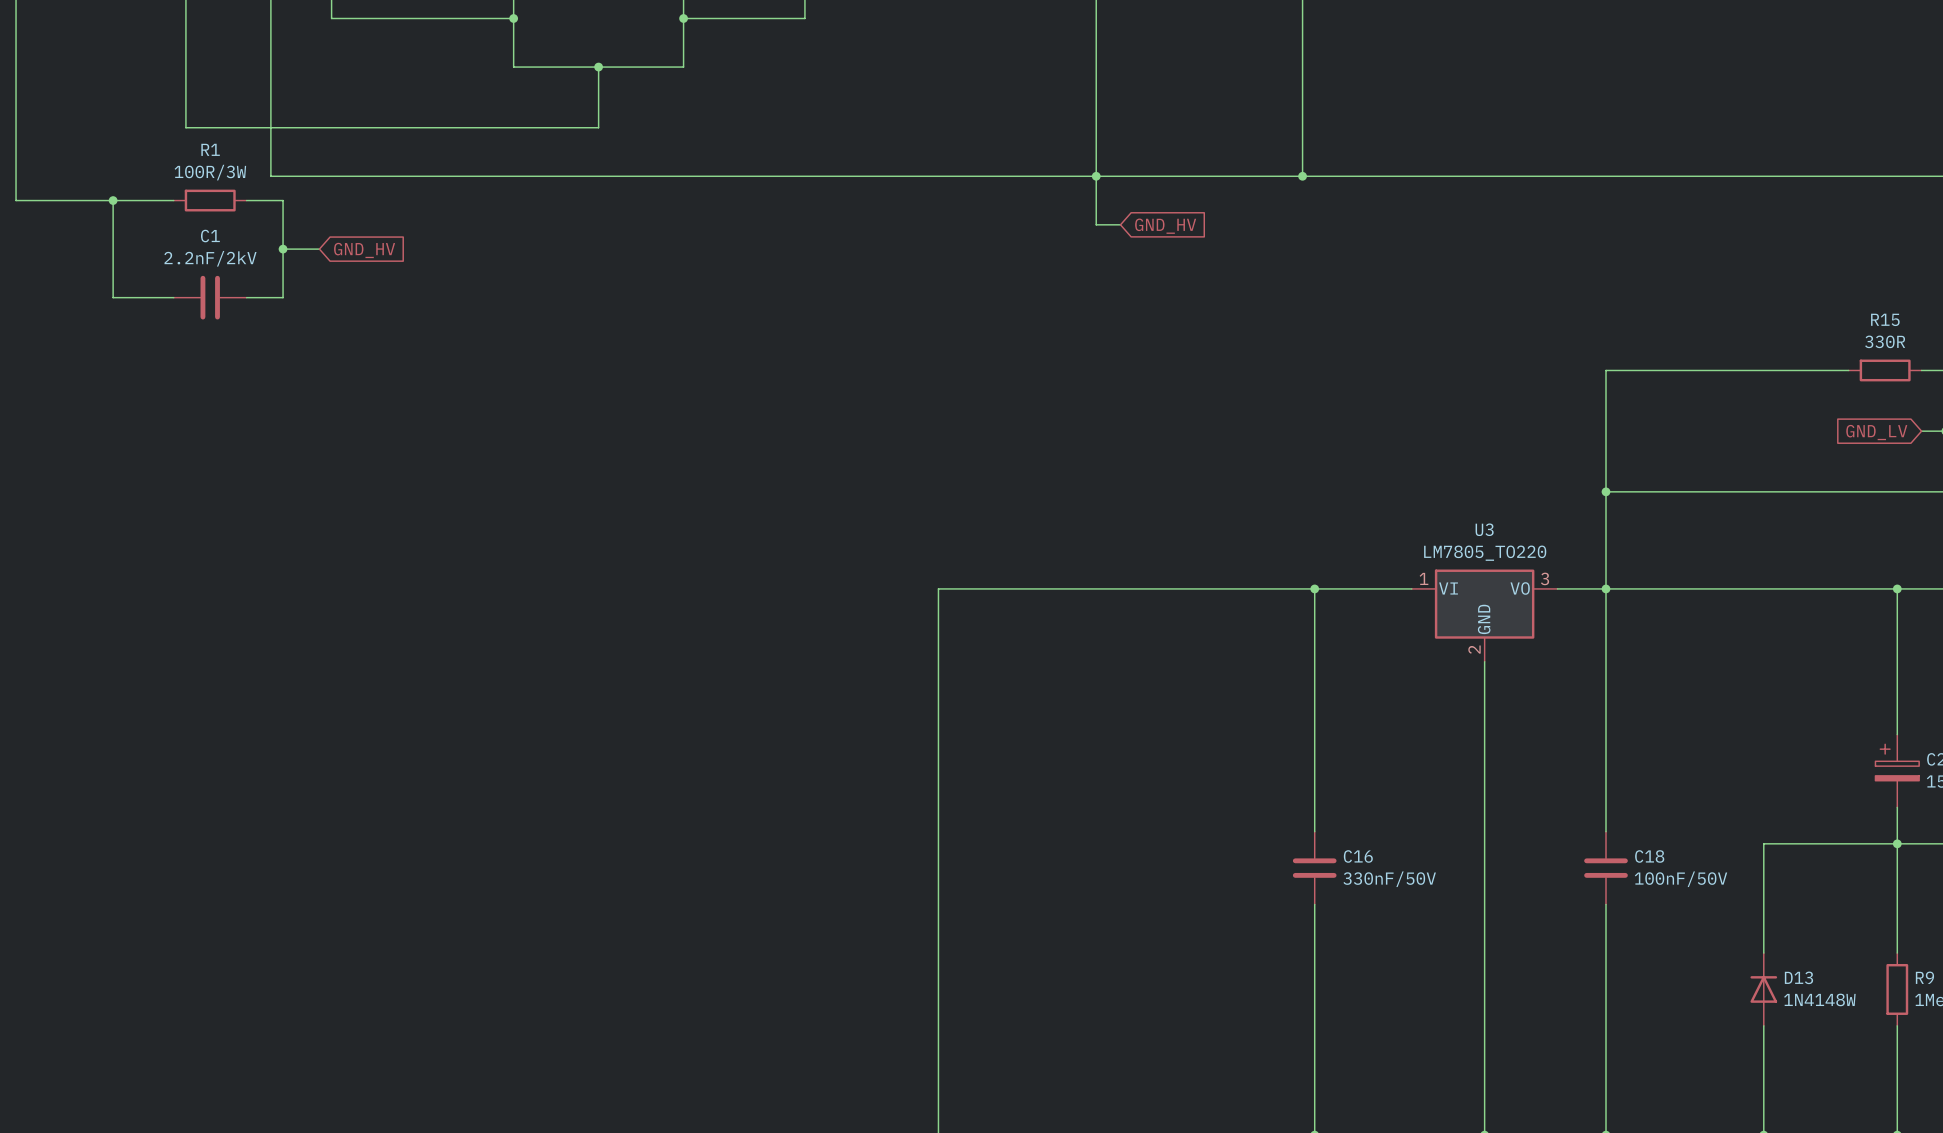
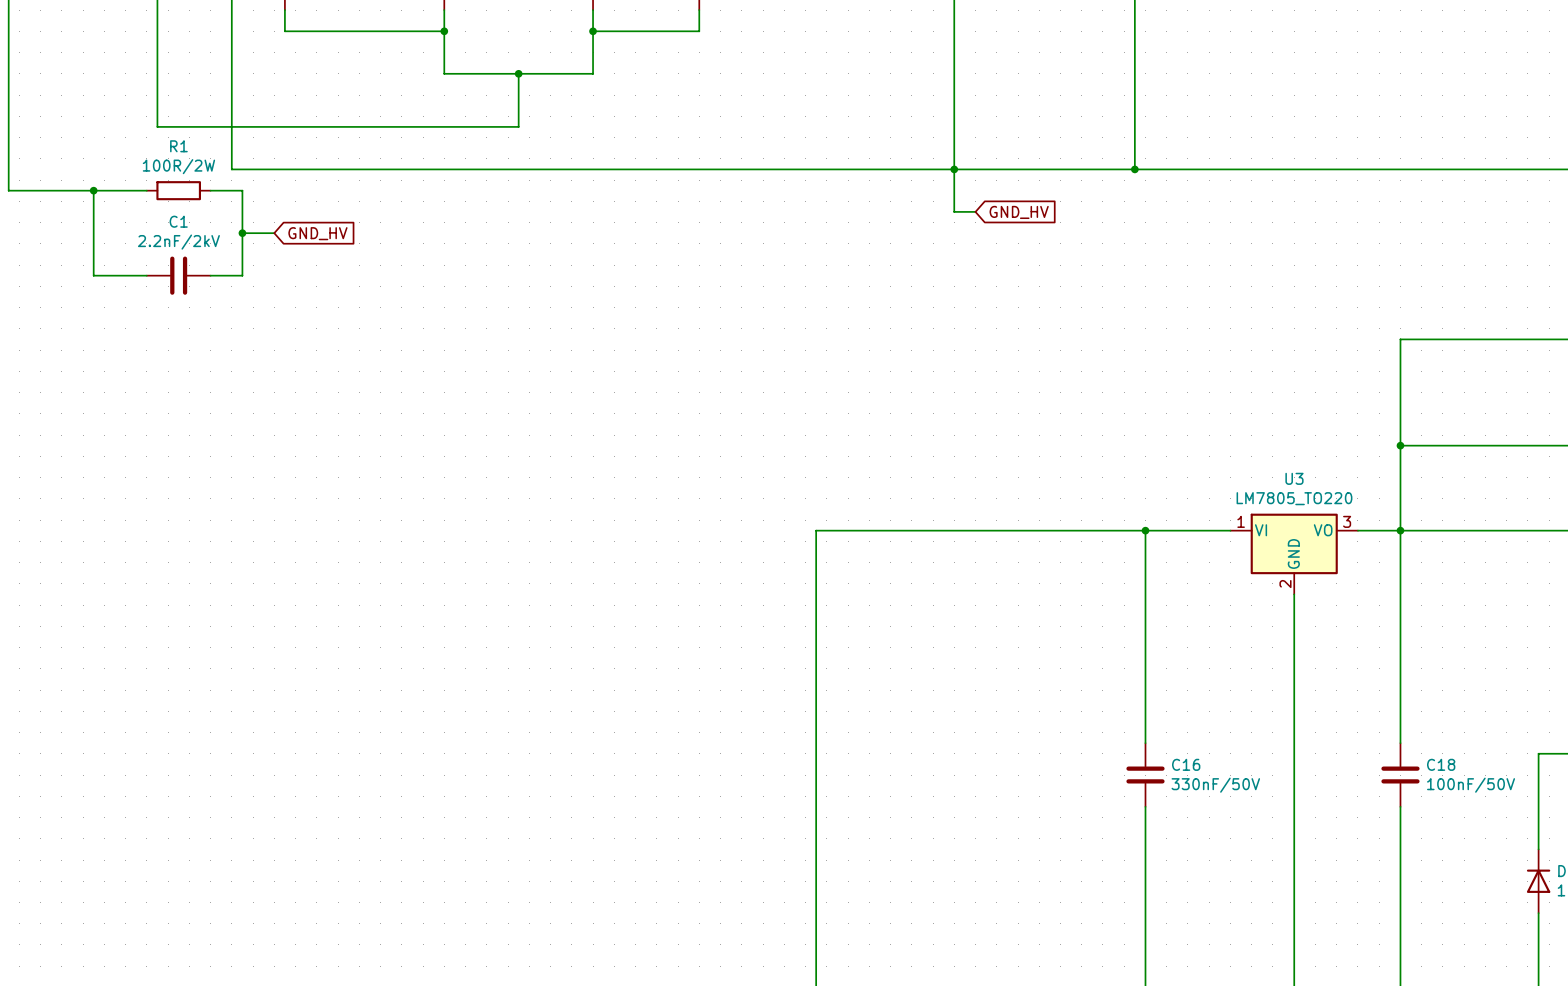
R1 value: 100R/3W (210, 172) -> 100R/2W (178, 166)

